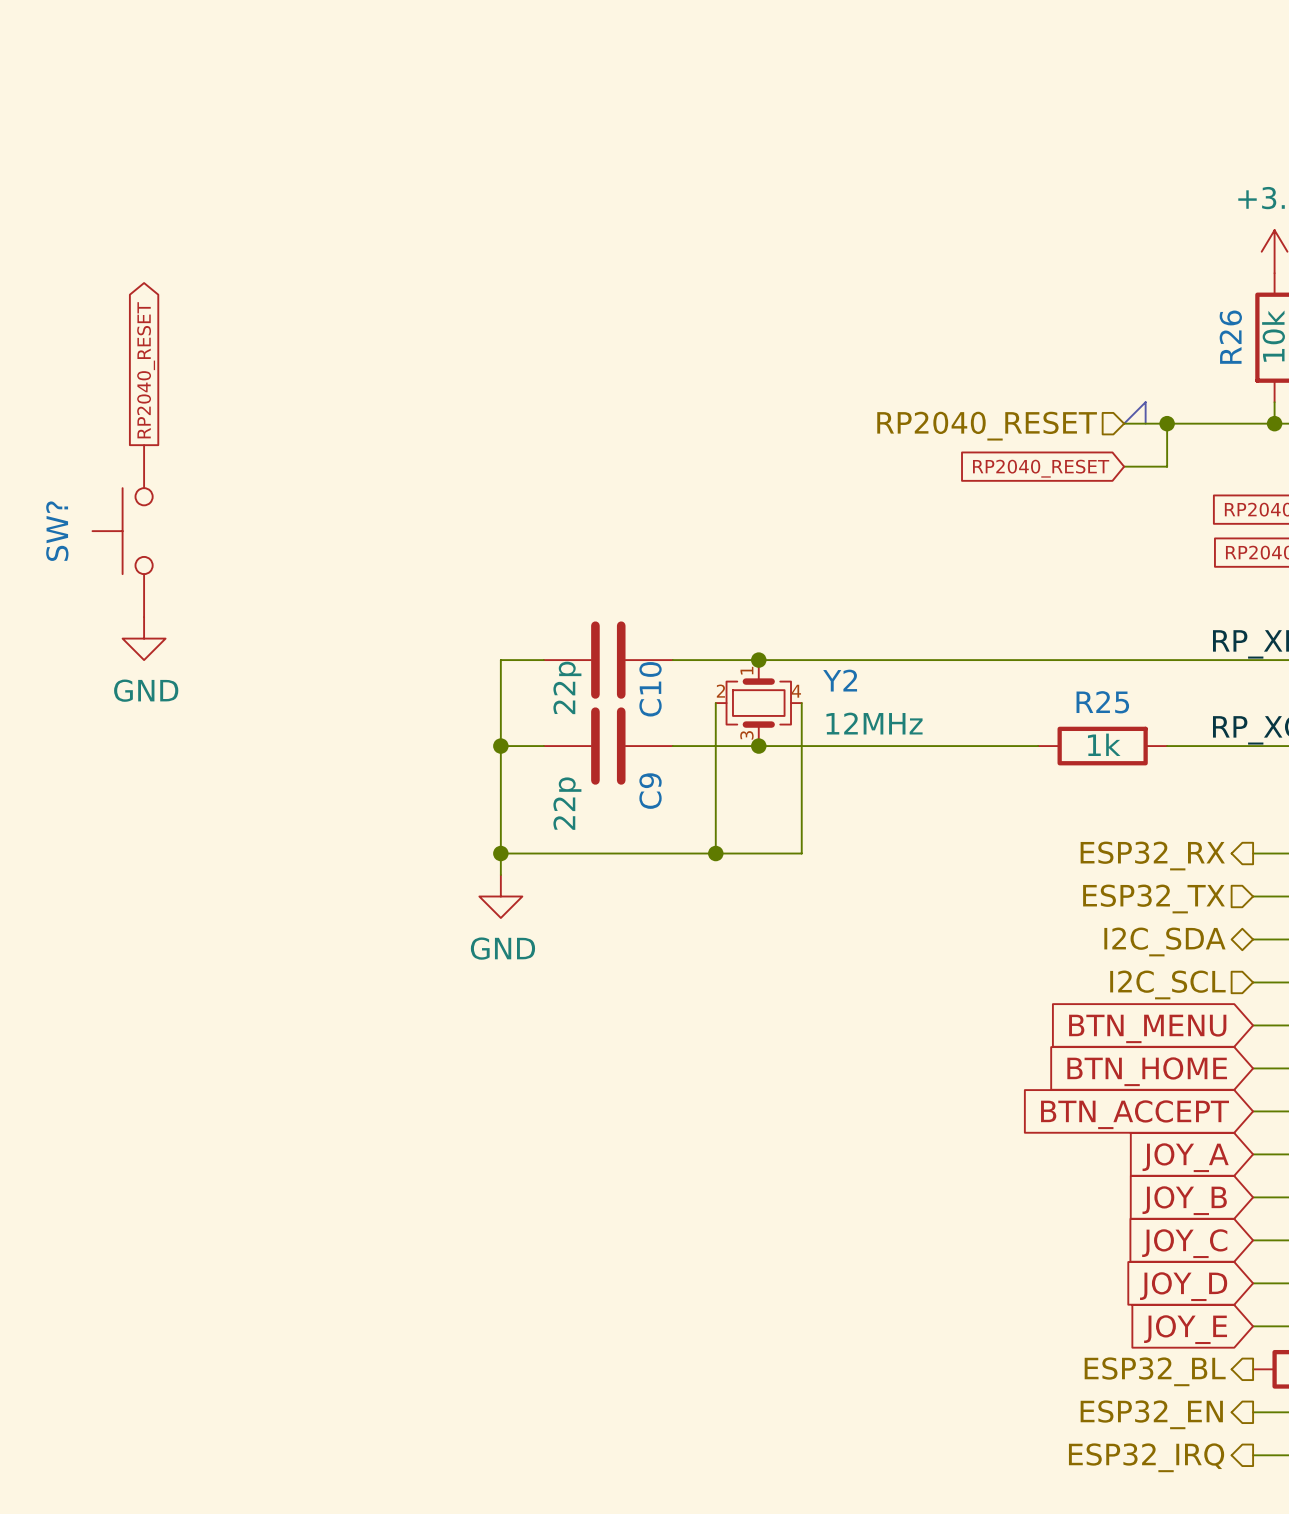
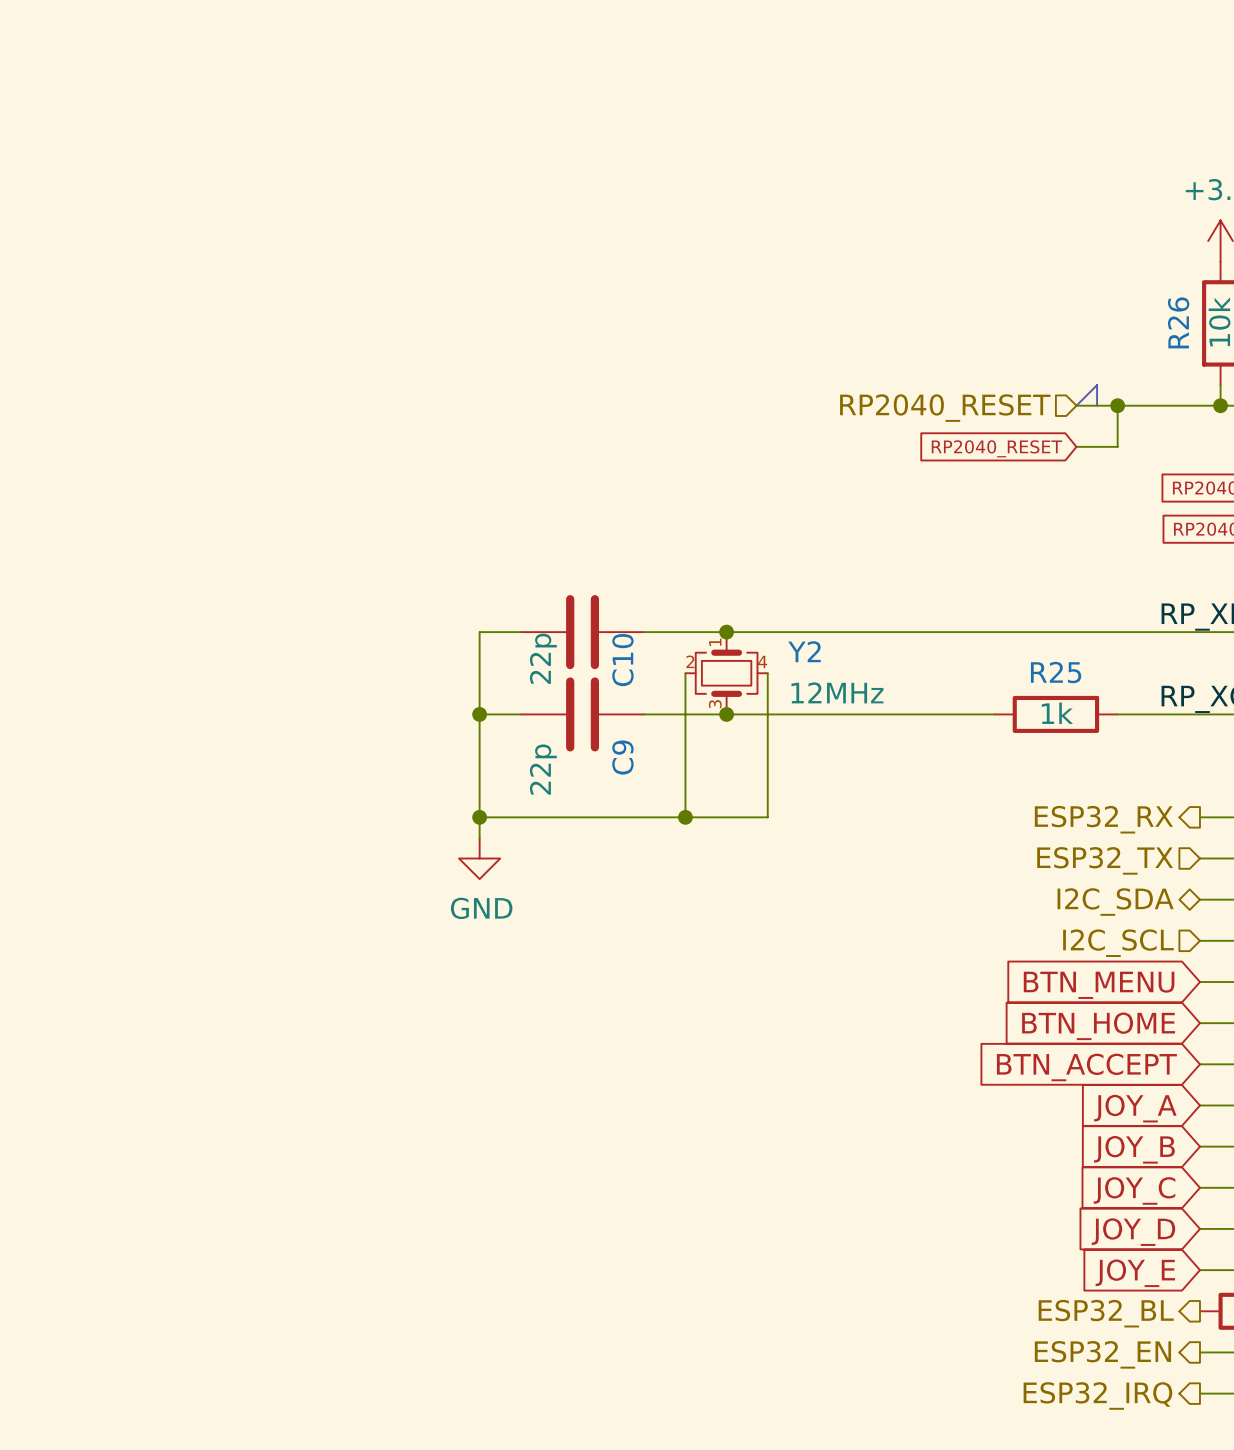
global label: RP2040_RESET (146, 370) -> none
SW?: (122, 531) -> none
power symbol: GND (144, 638) -> none

